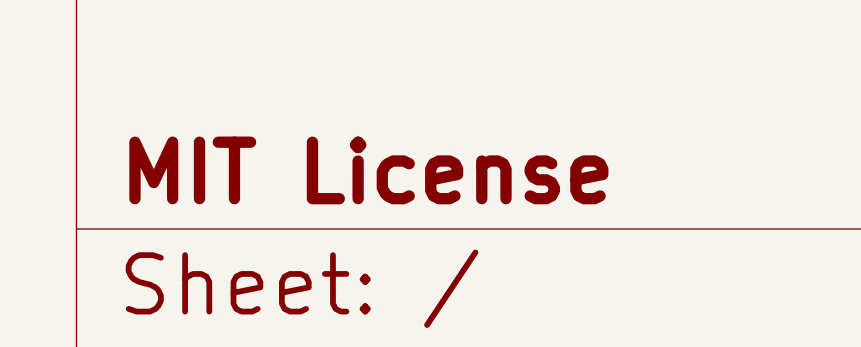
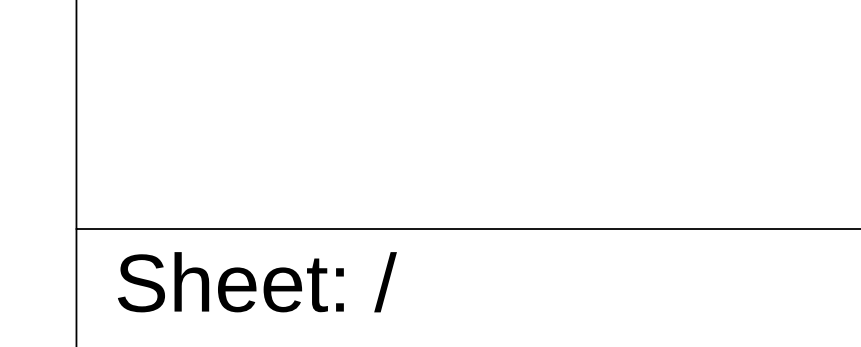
title block: MIT License (368, 170) -> none

